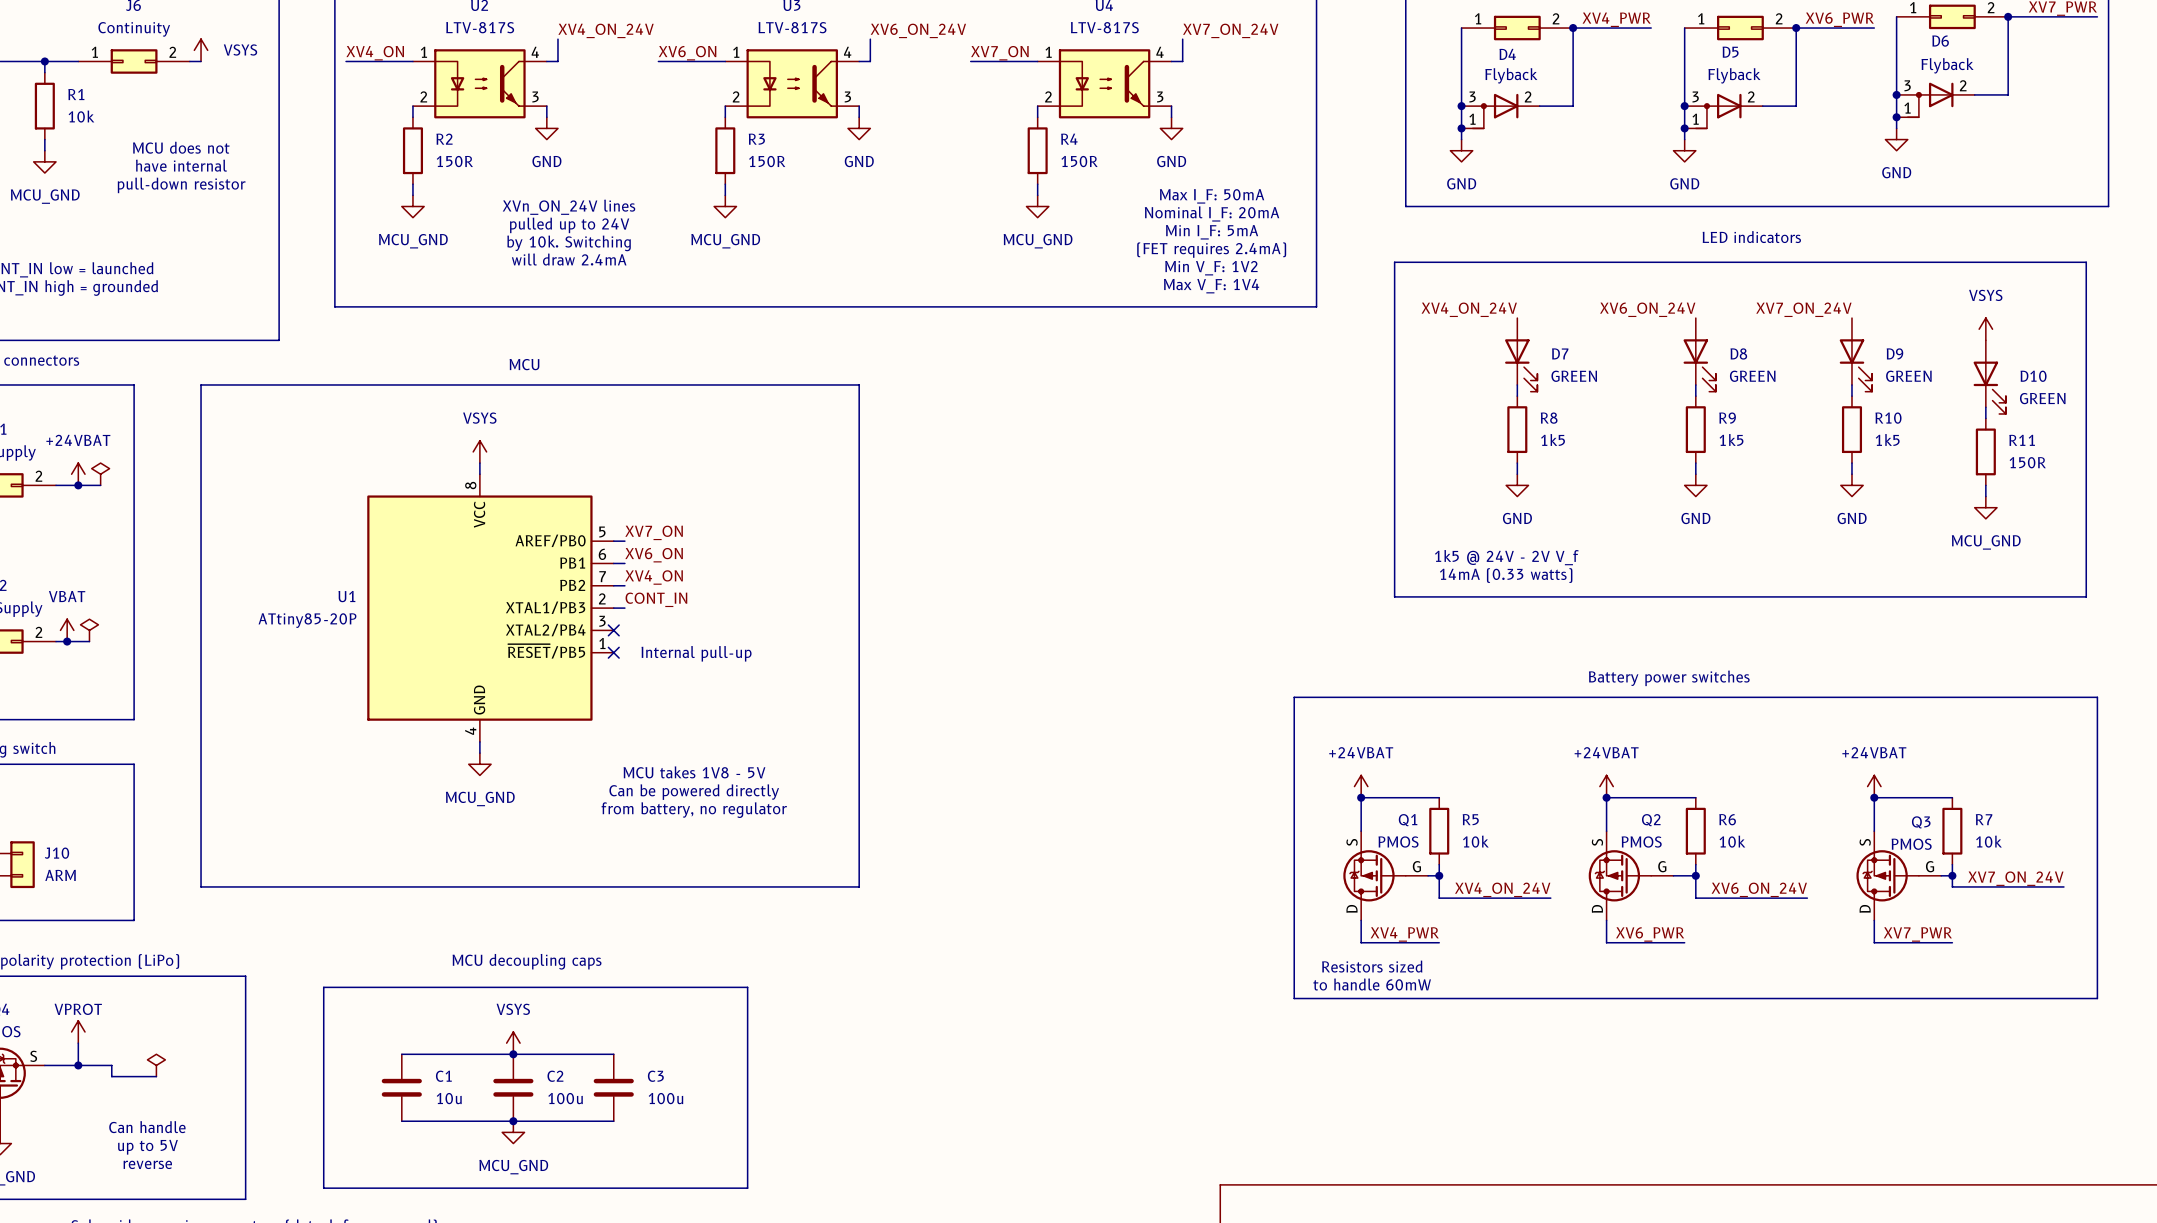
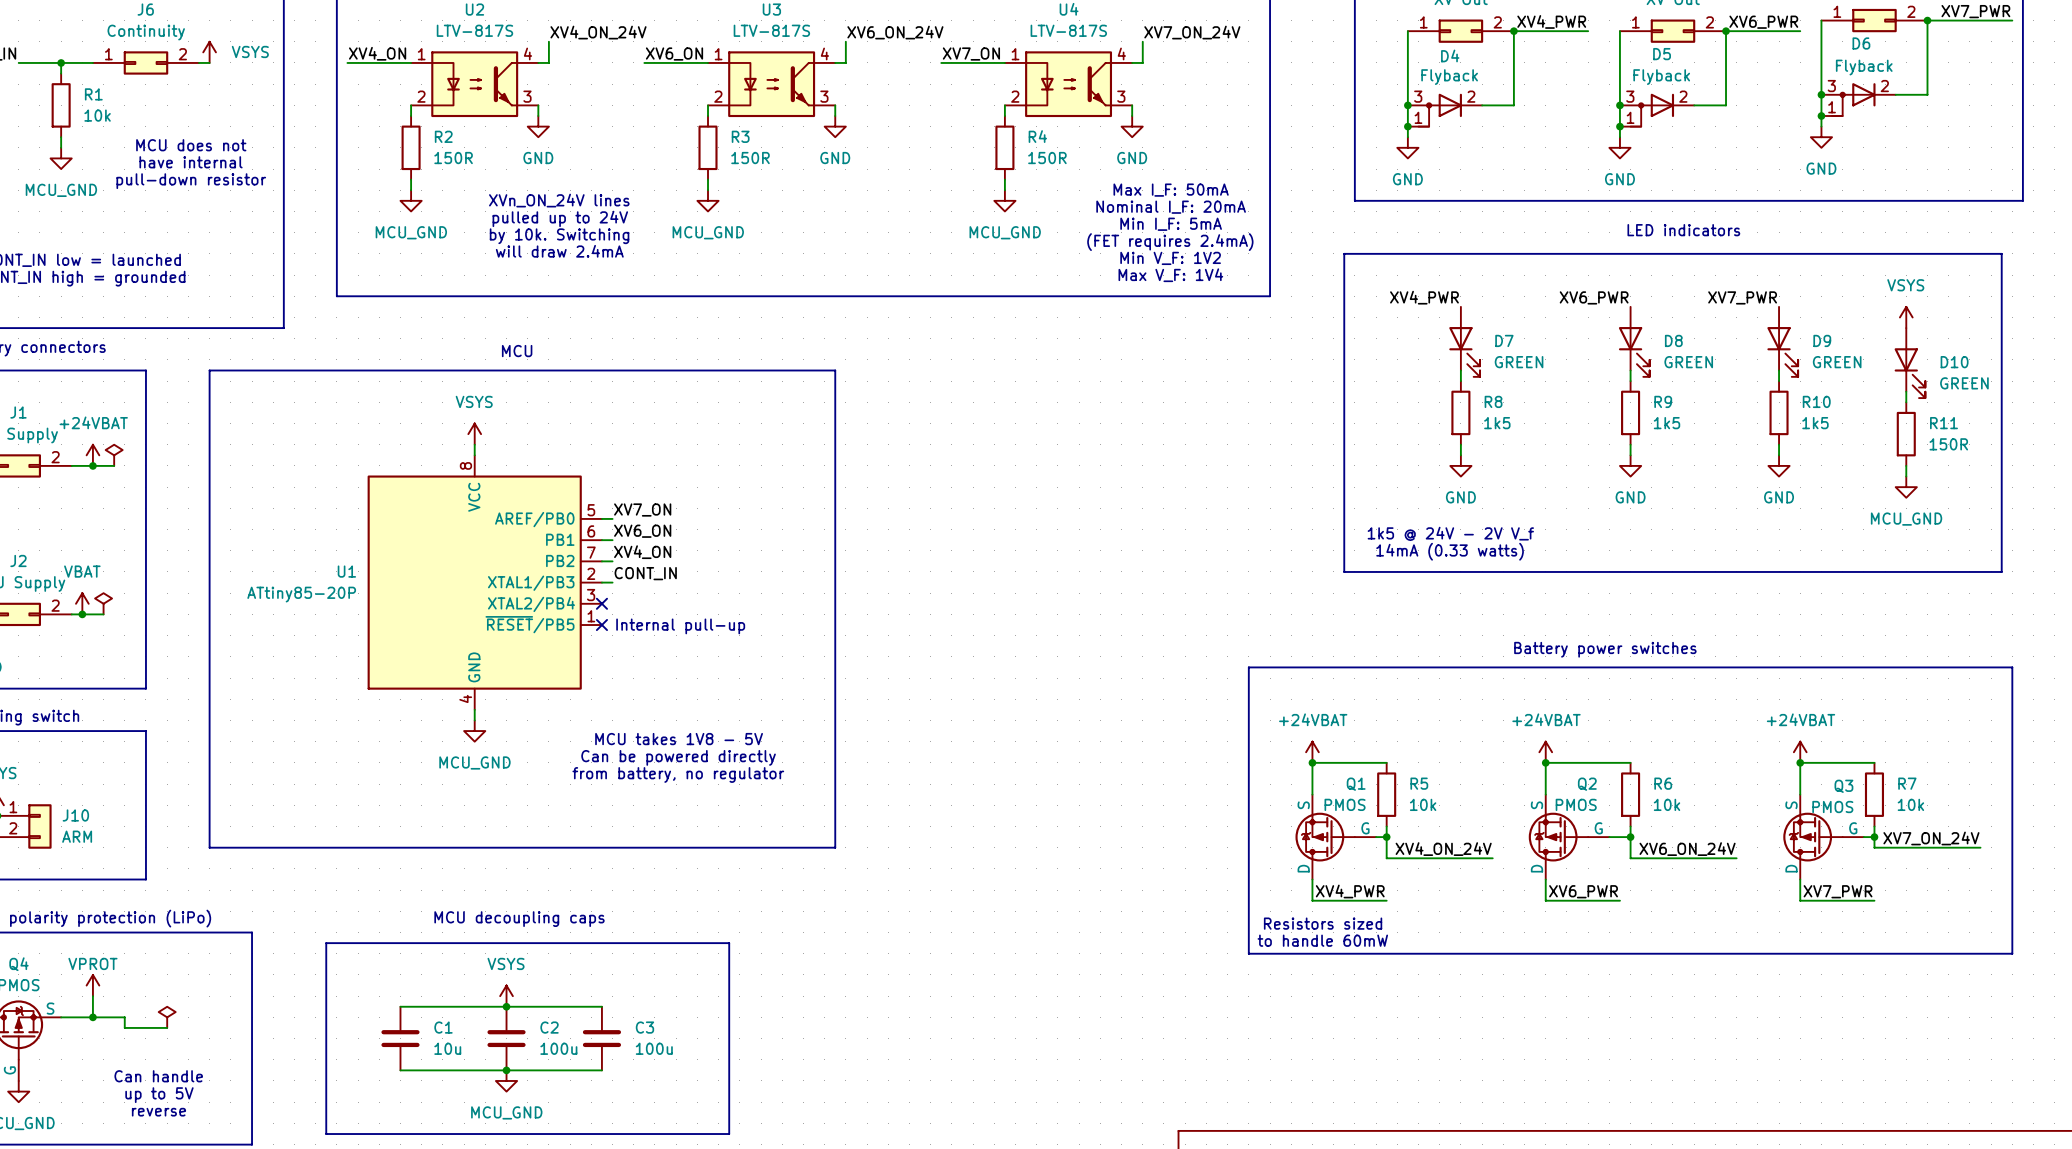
label: XV4_ON_24V (1469, 309) -> XV4_PWR (1424, 297)
label: XV6_ON_24V (1647, 309) -> XV6_PWR (1594, 297)
label: XV7_ON_24V (1803, 309) -> XV7_PWR (1742, 297)

